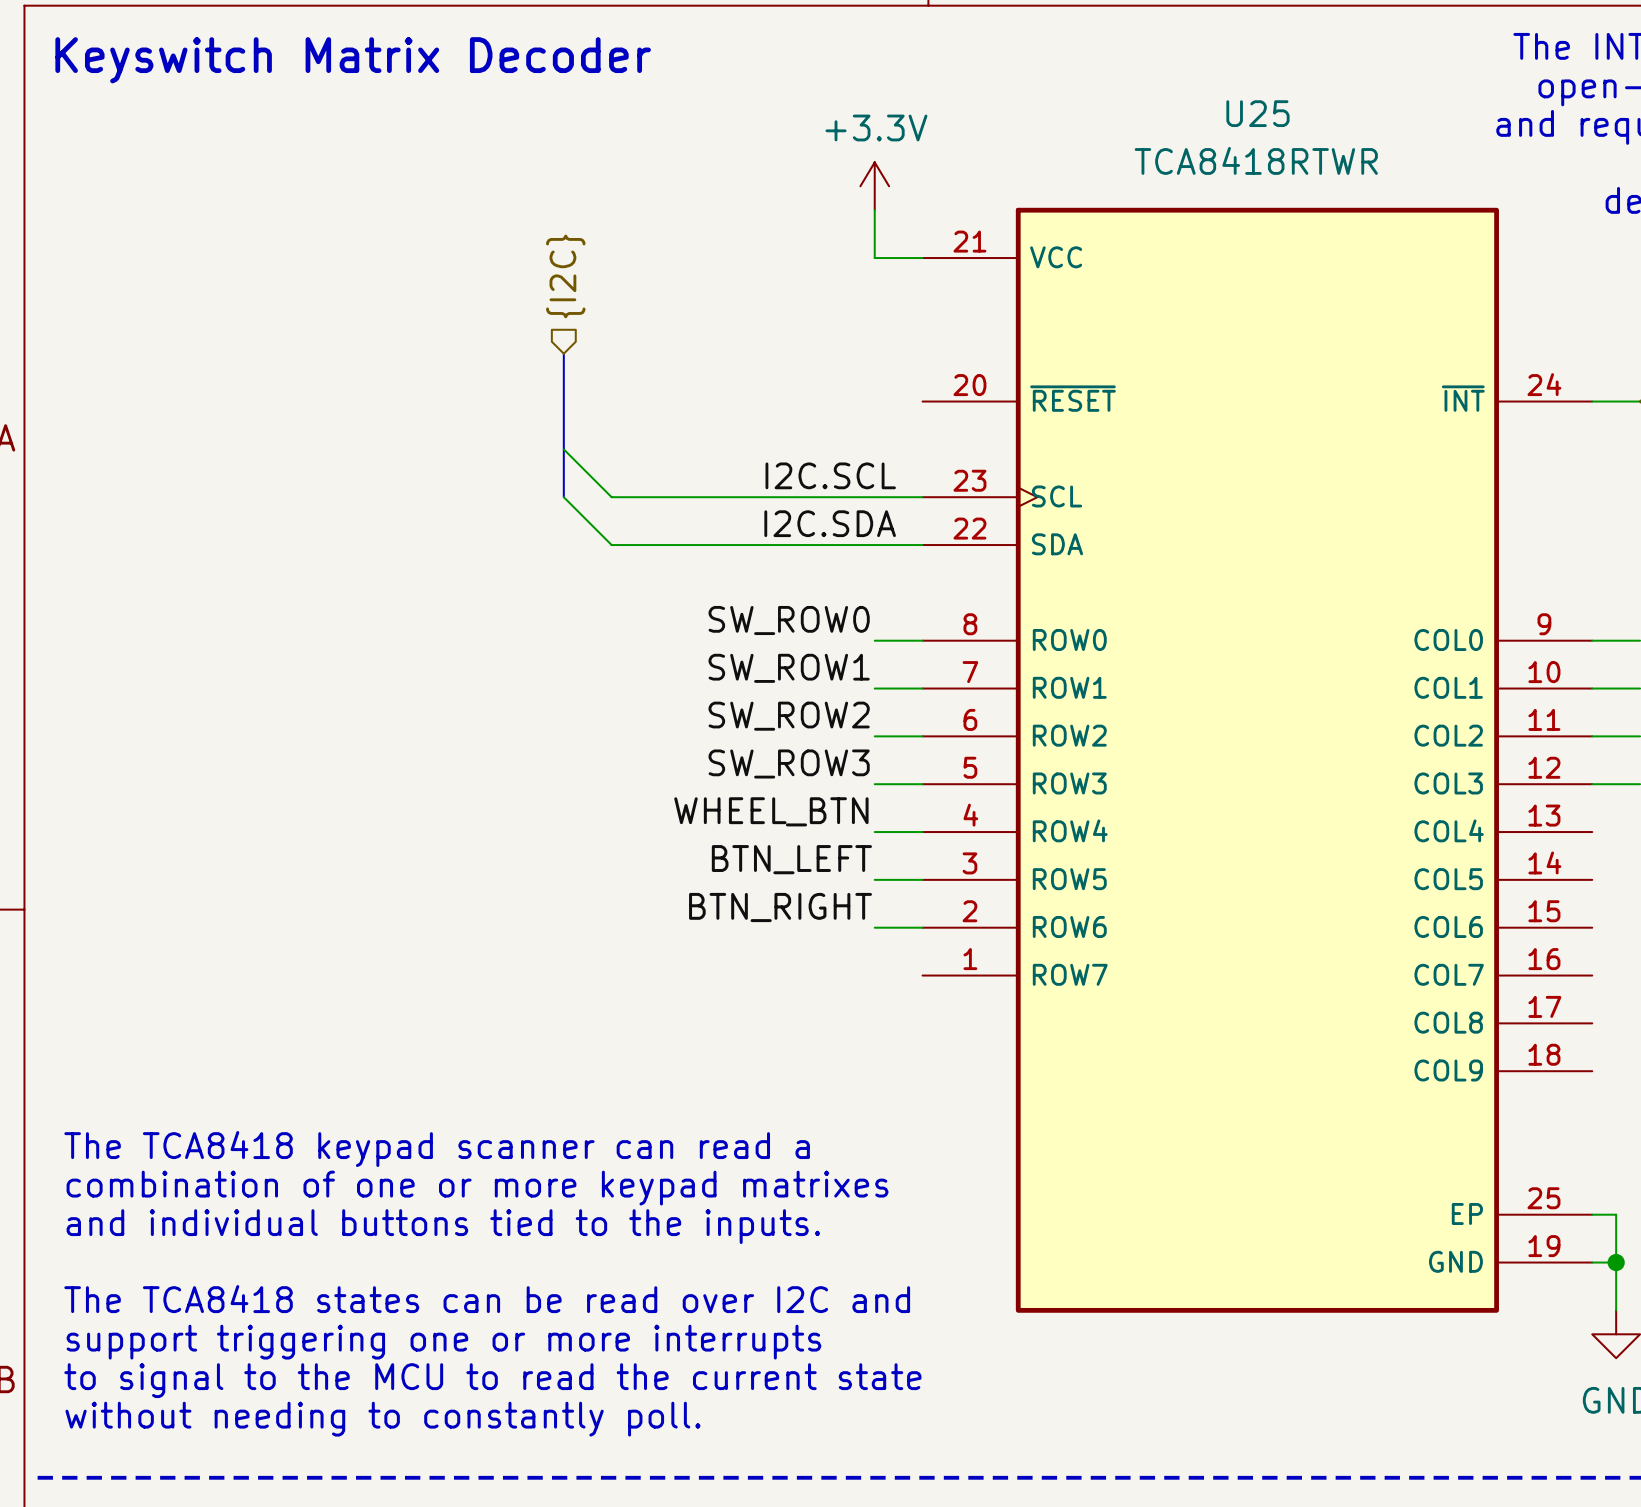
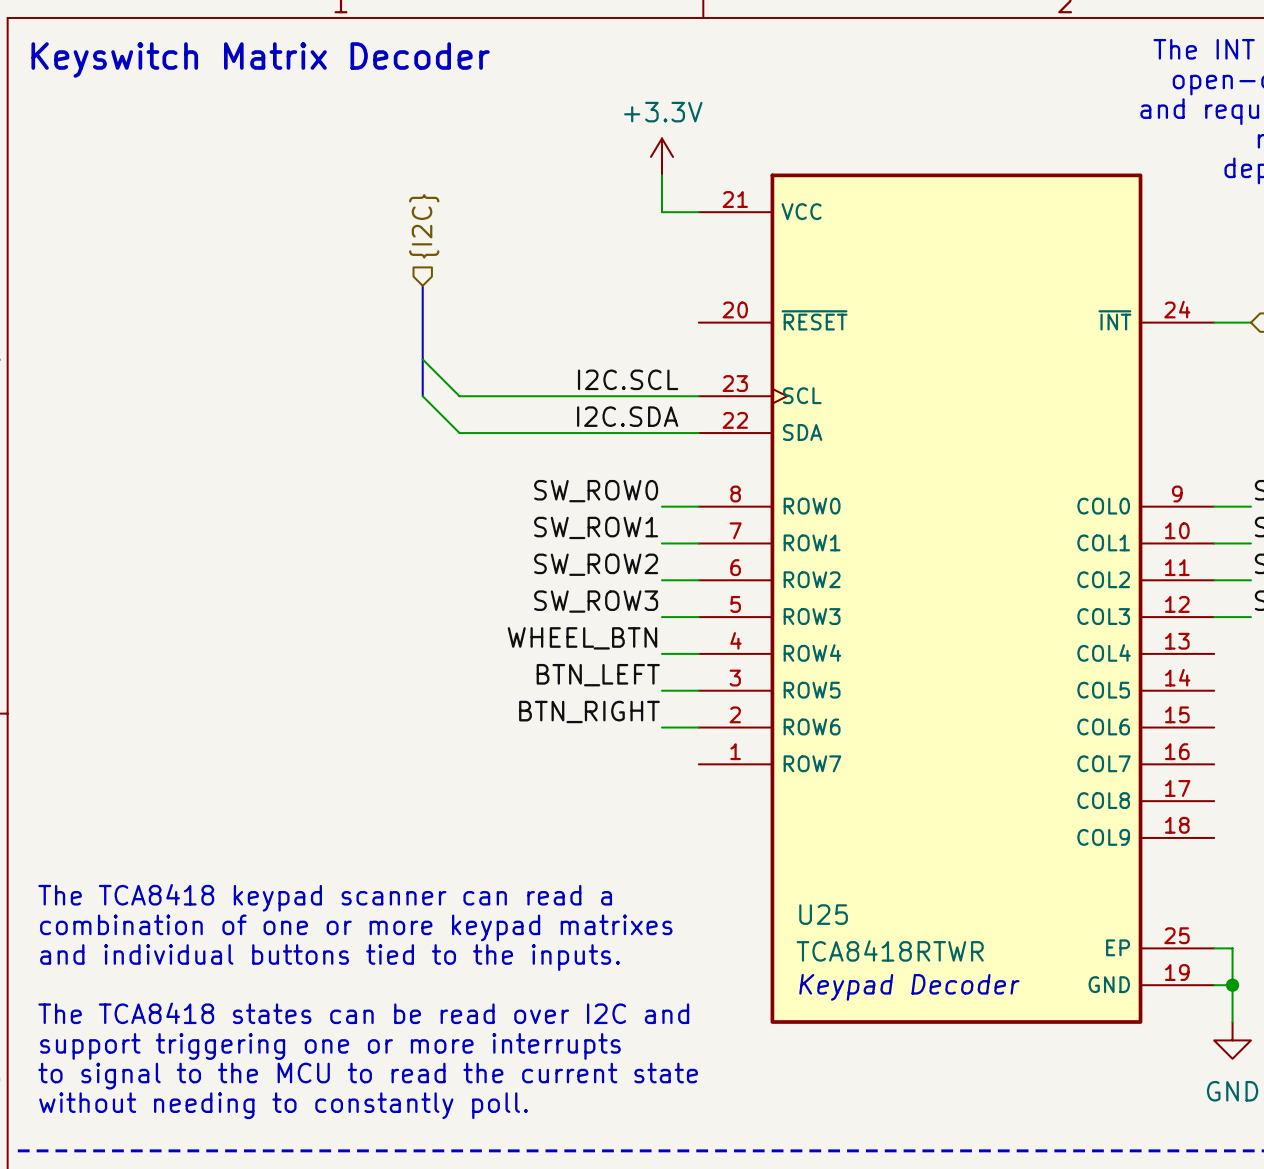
U25 name position: U25 (1257, 113) -> U25 (823, 914)
U25 value position: TCA8418RTWR (1256, 160) -> TCA8418RTWR (890, 950)
text: none -> Keypad Decoder (909, 987)

